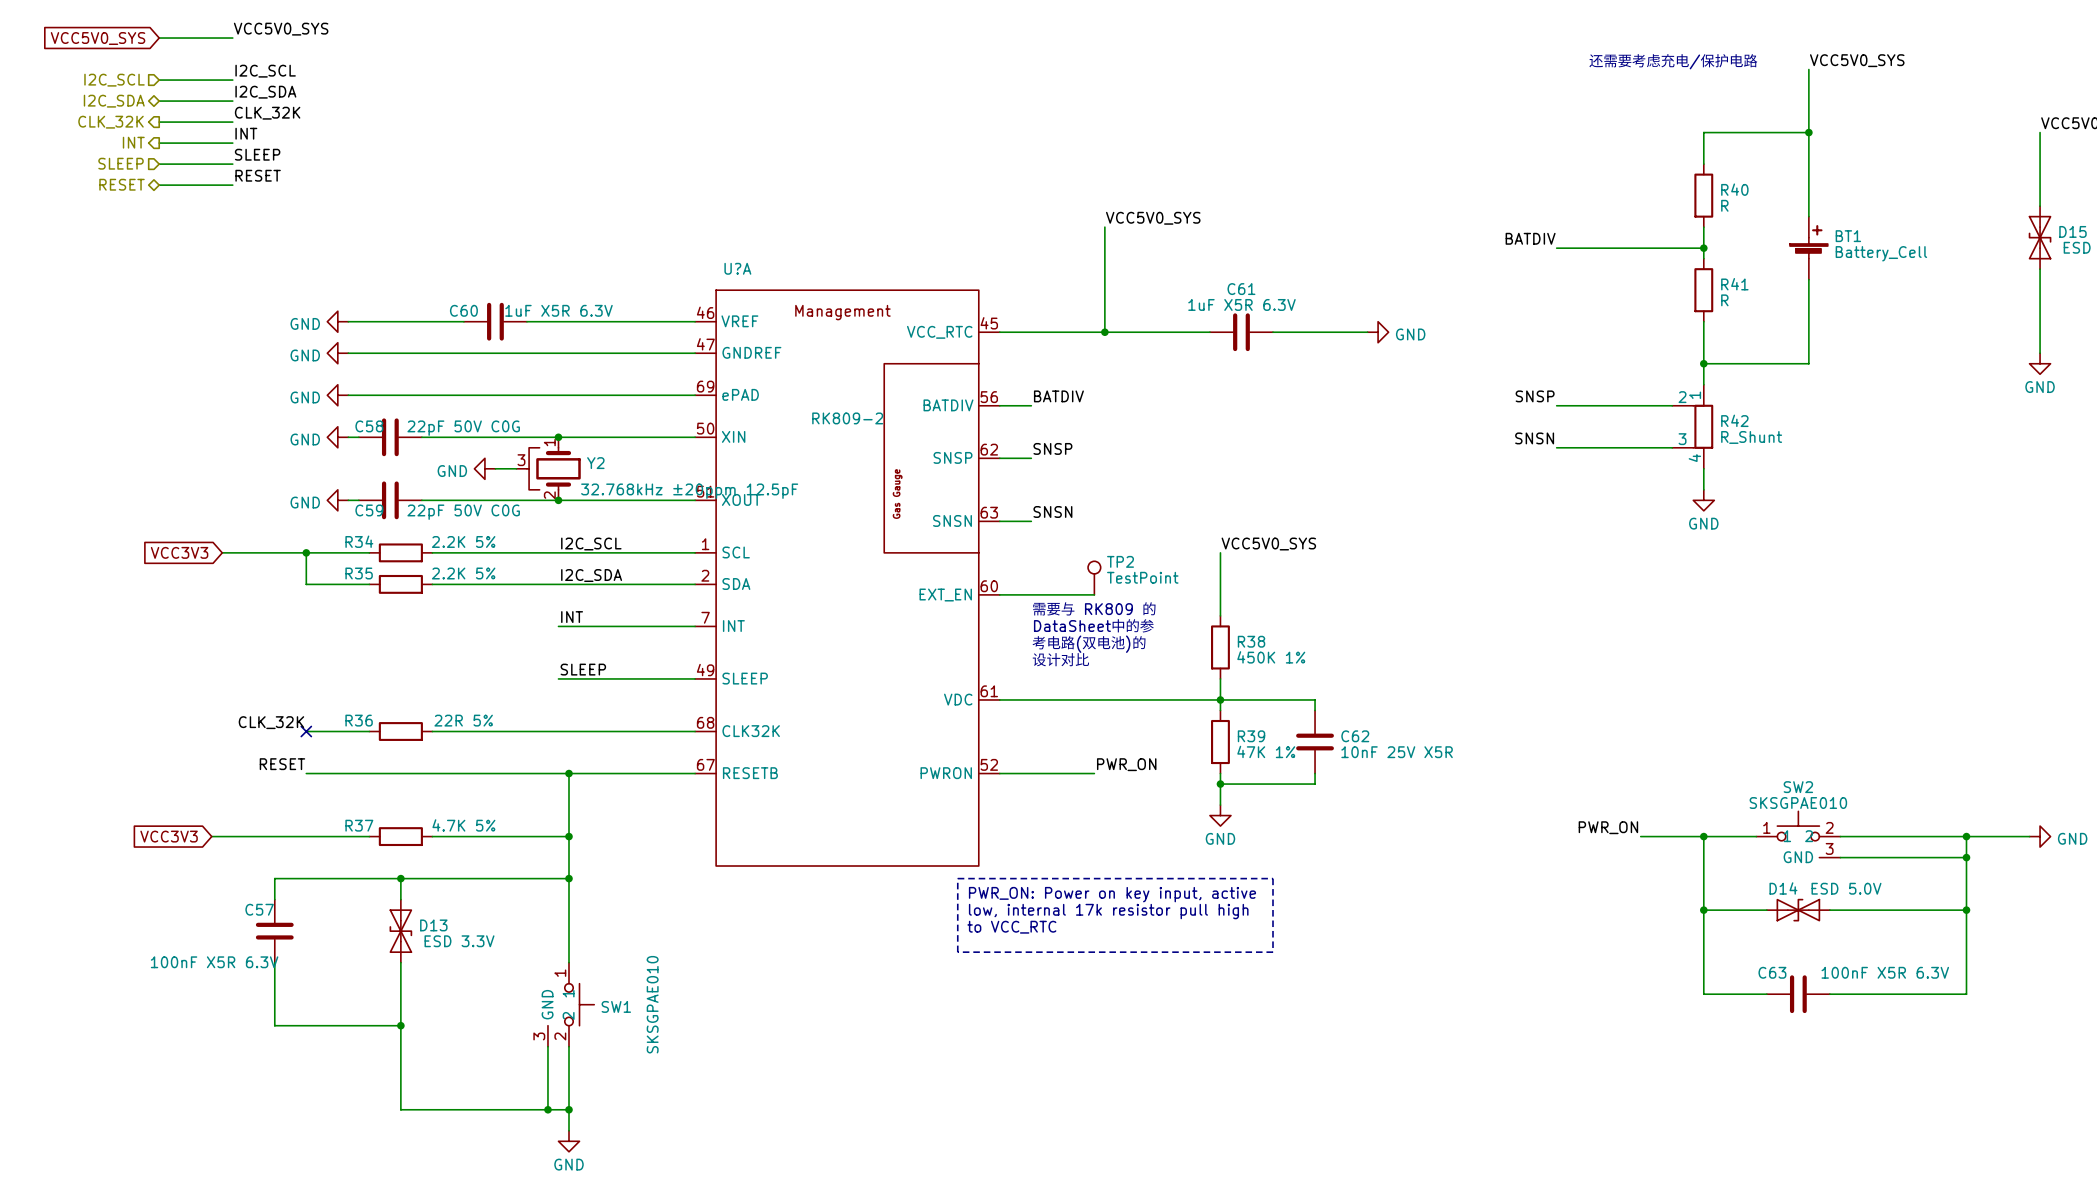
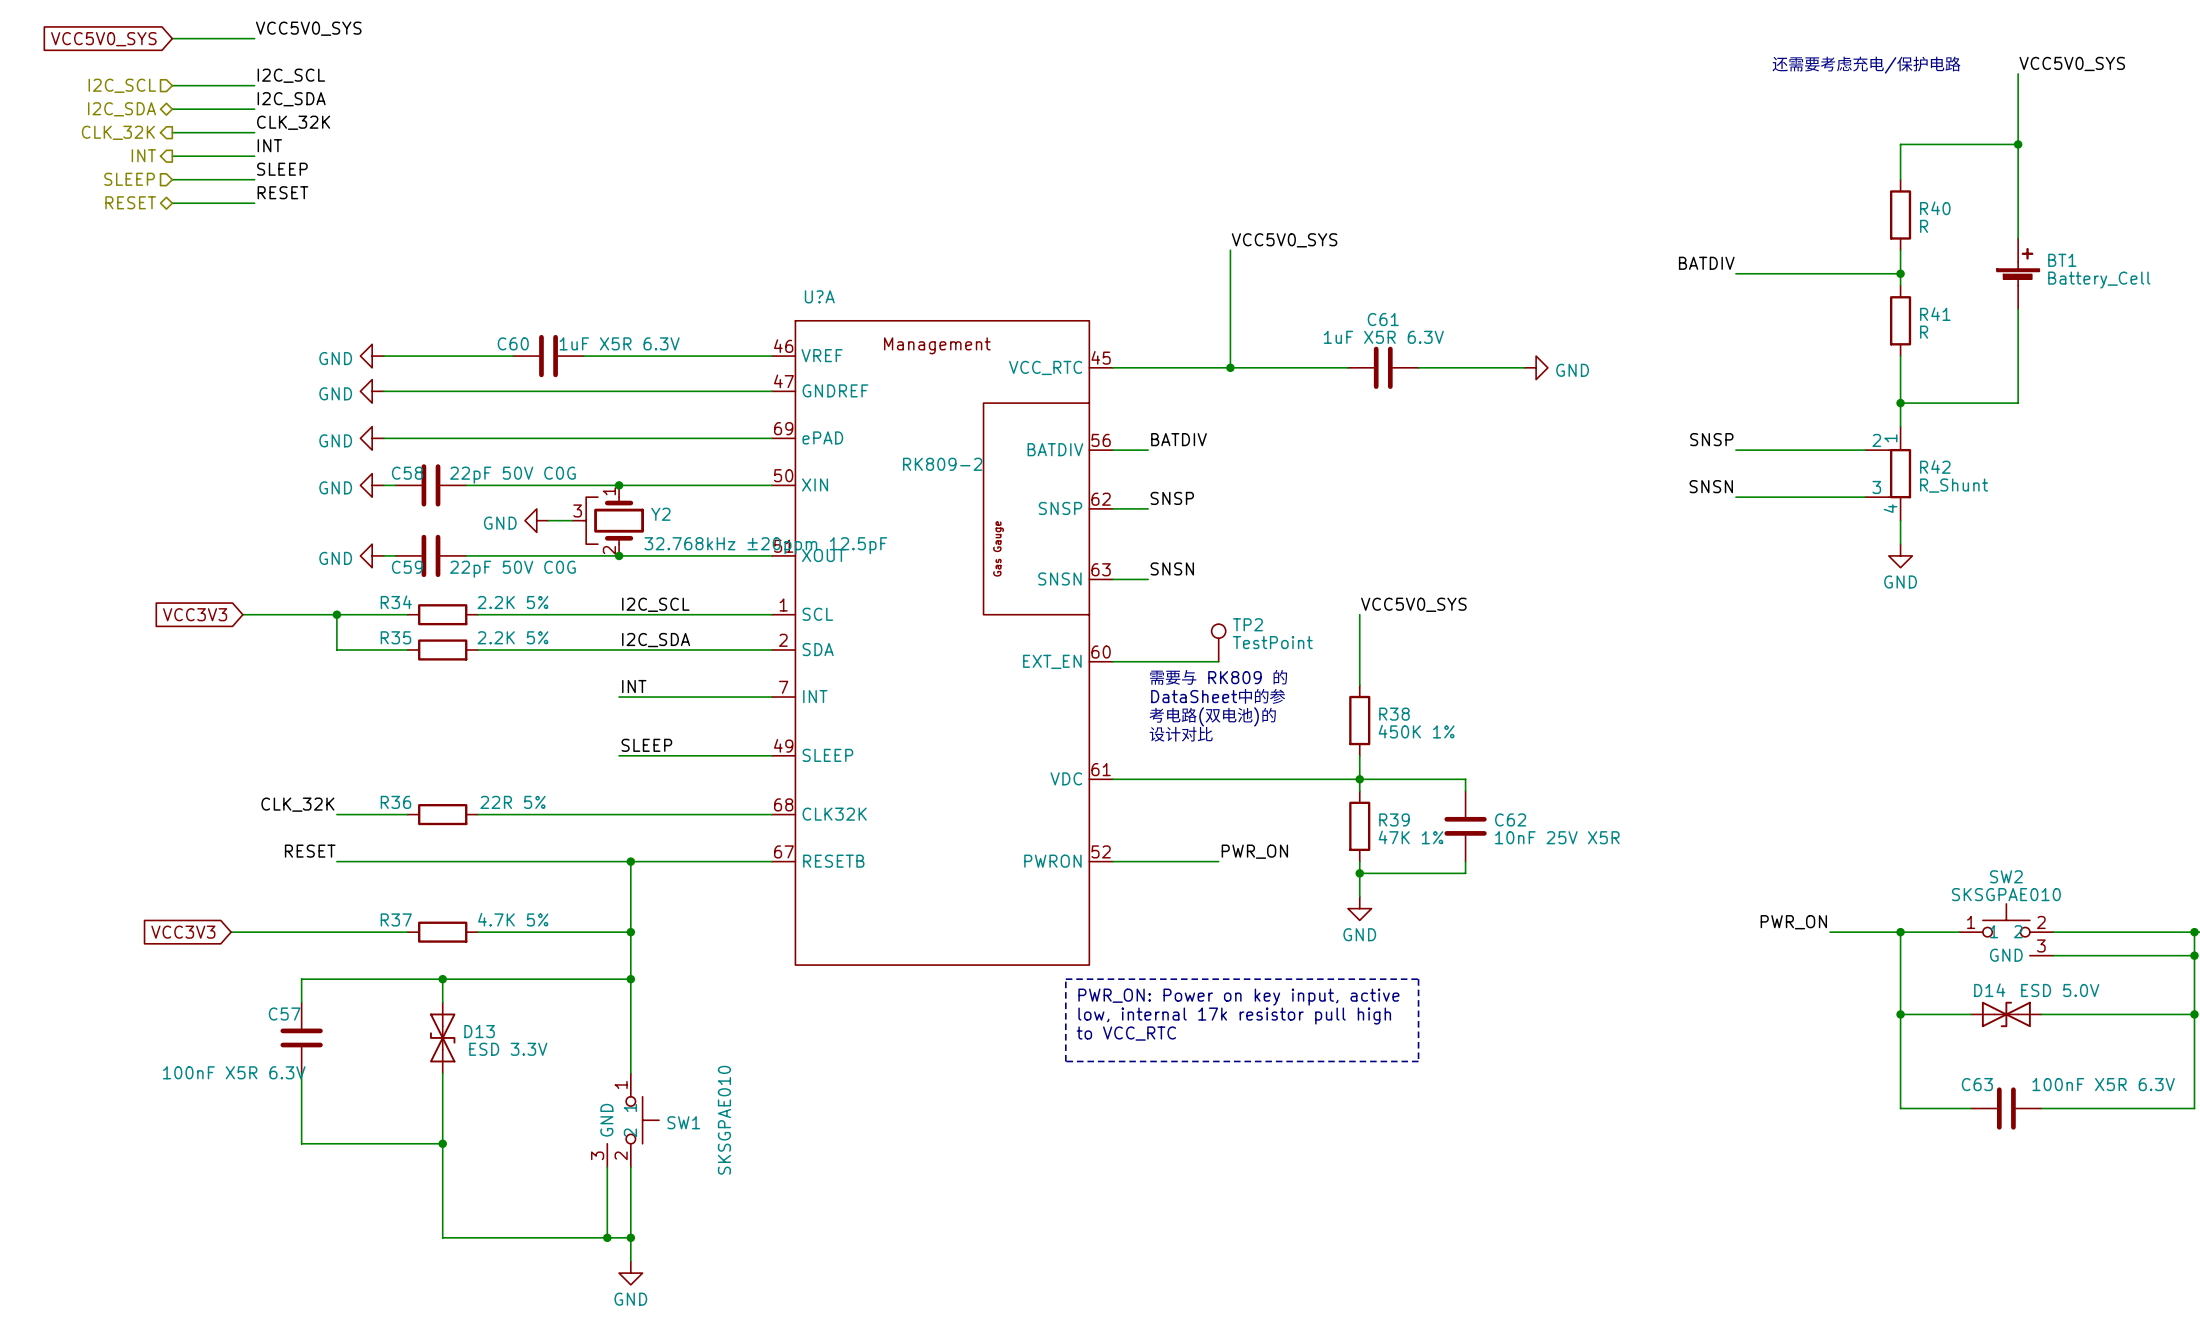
no-connect mark: (306, 731) -> none

